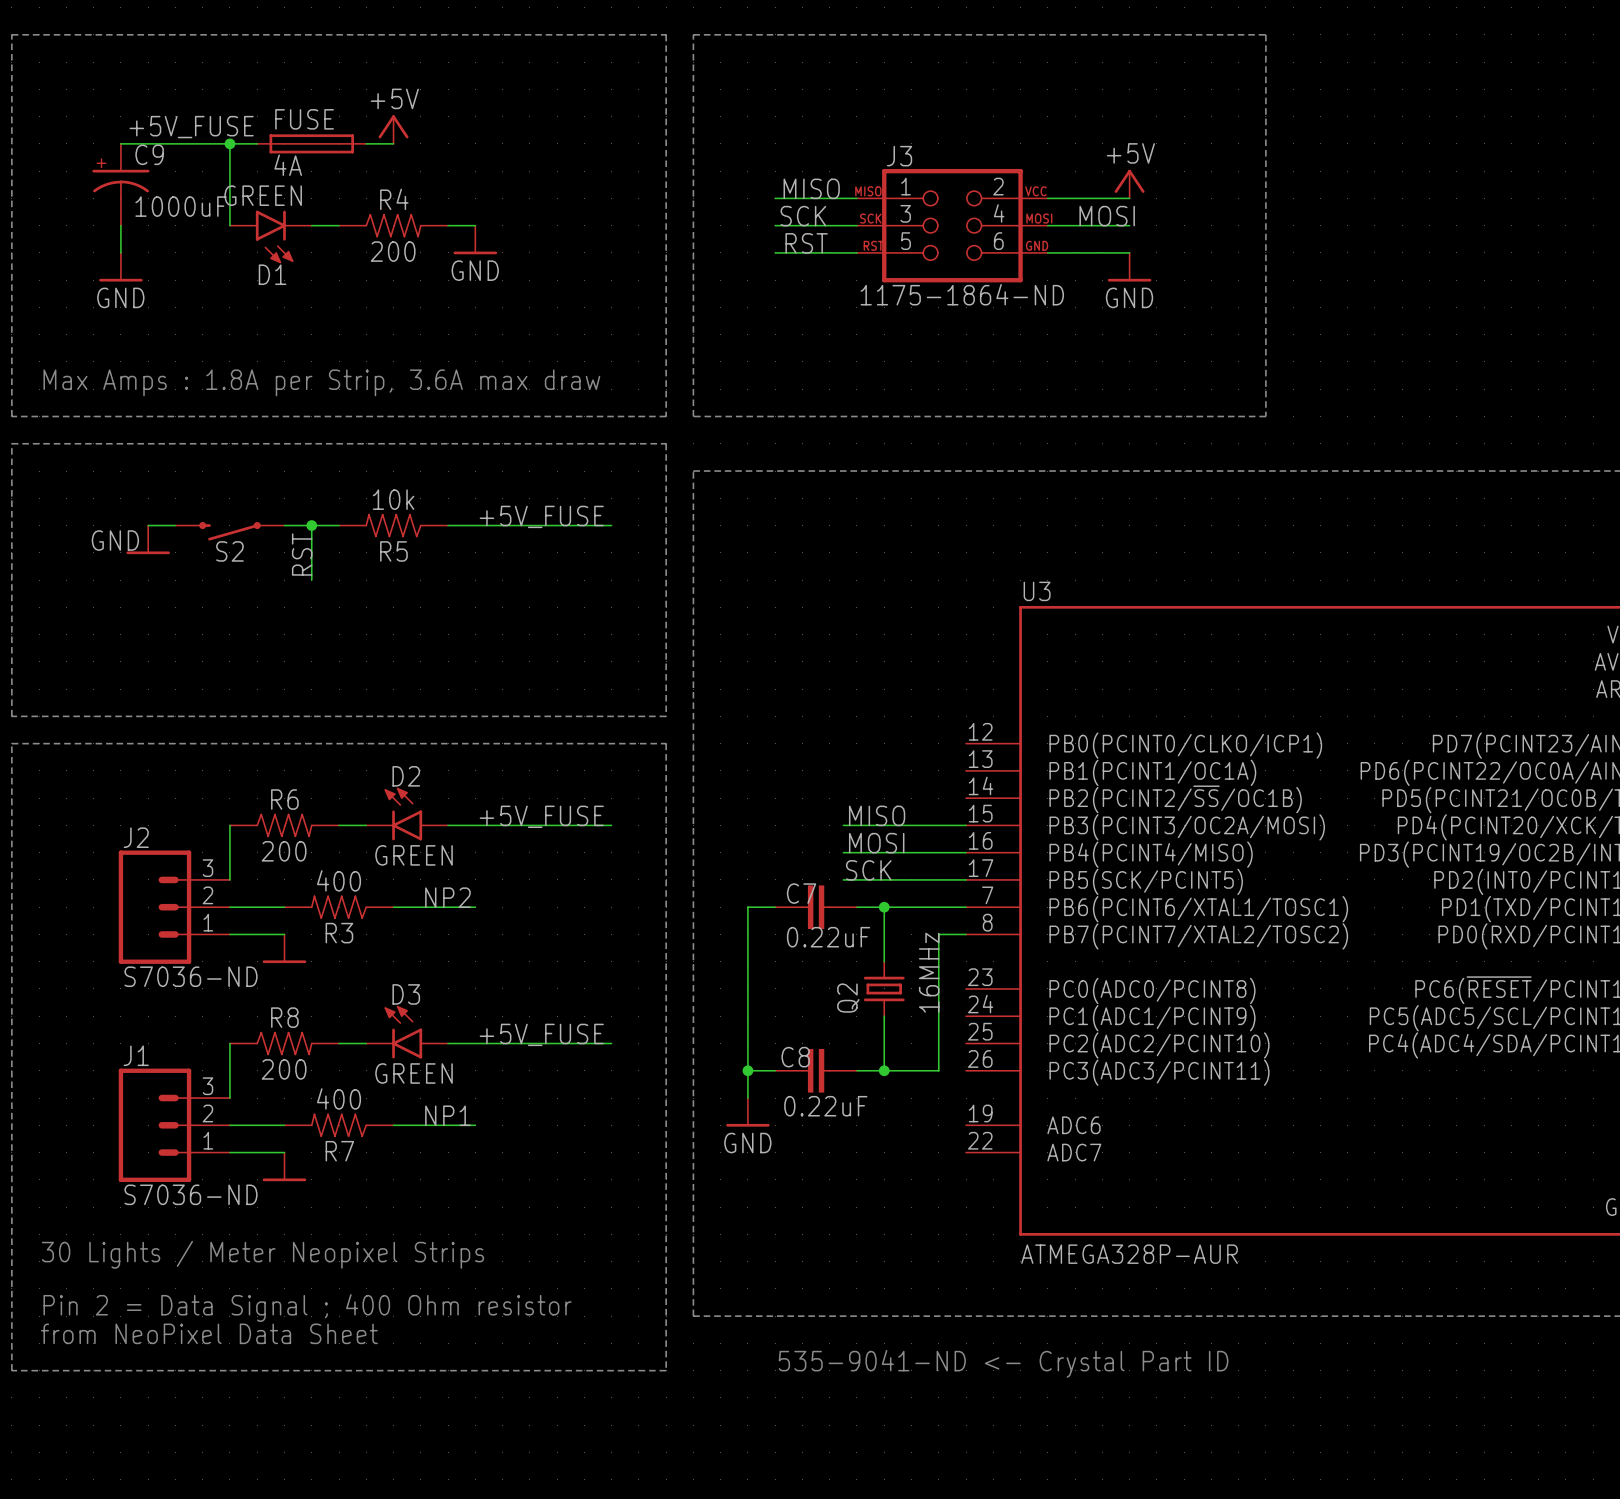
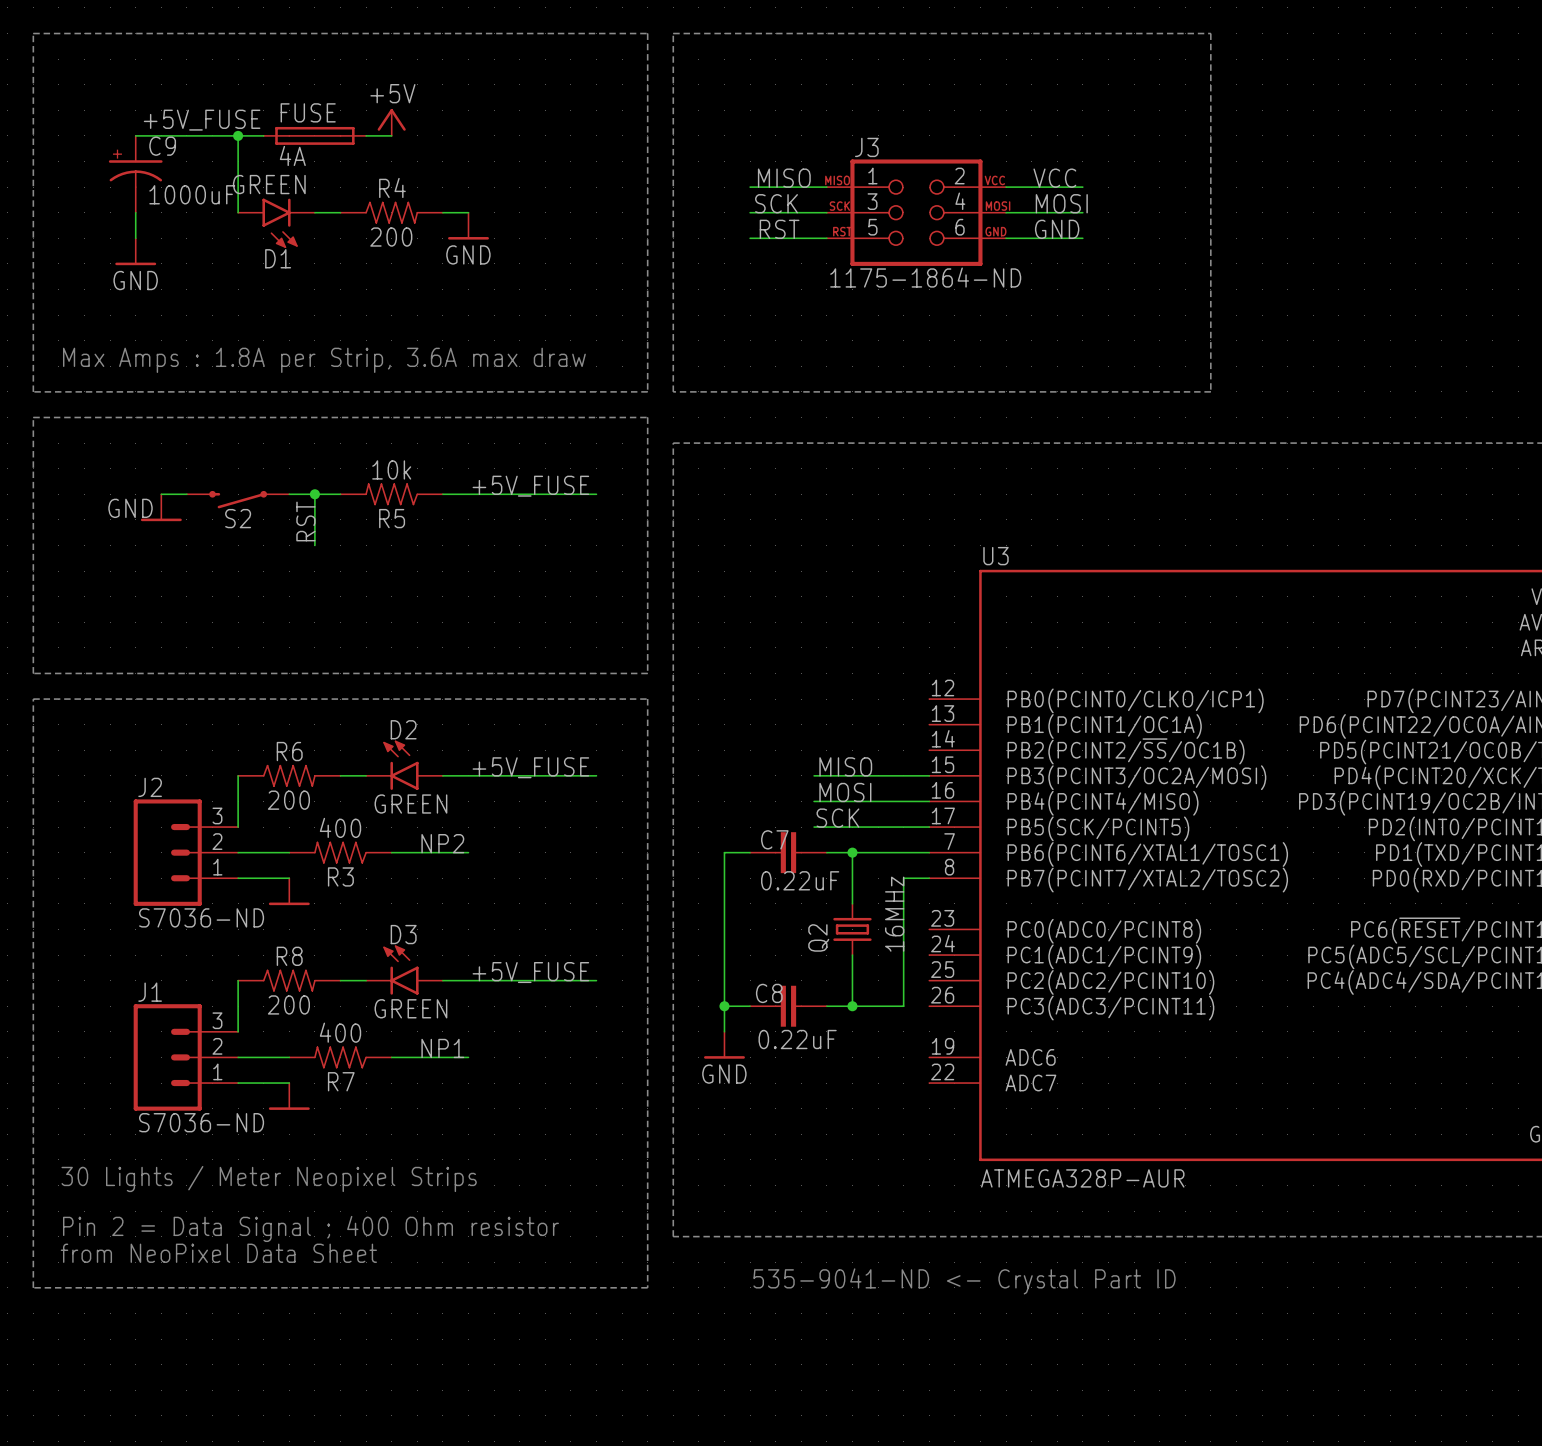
power symbol: +5V (1129, 184) -> none
label: none -> VCC (1054, 178)
label: none -> GND (1057, 229)
power symbol: GND (1129, 267) -> none

